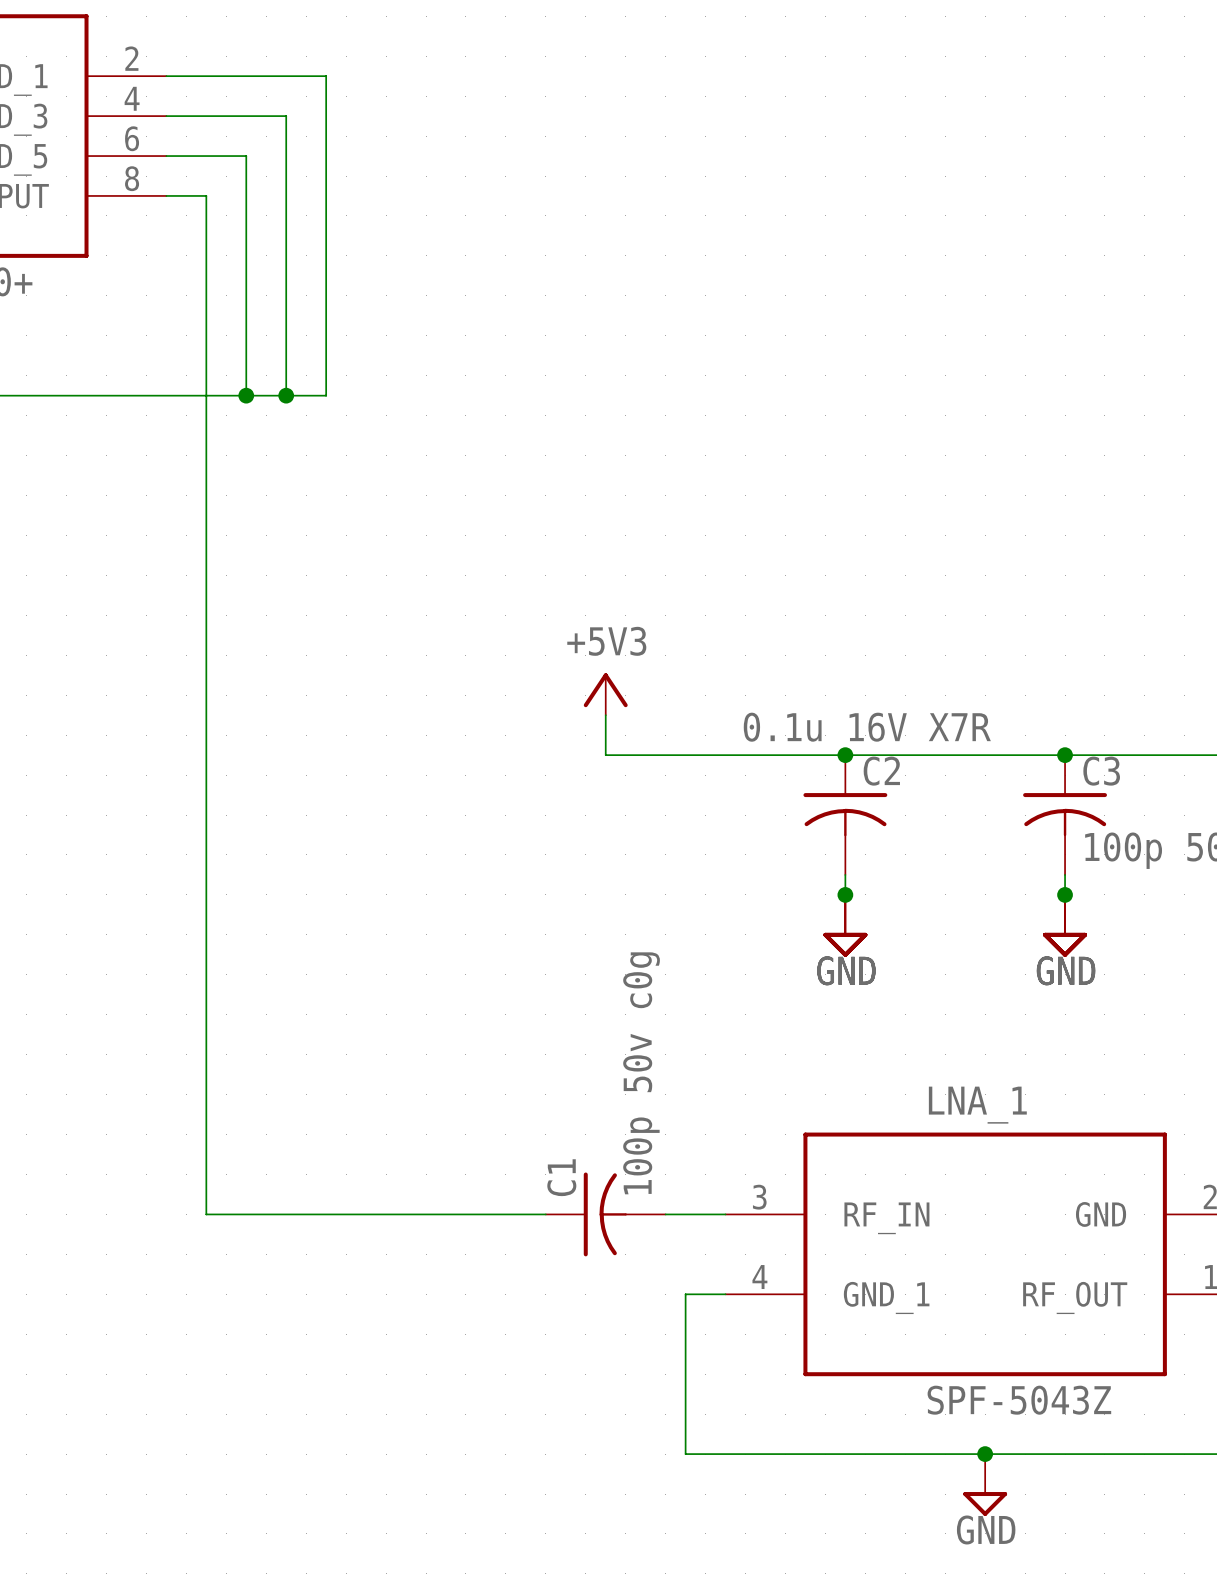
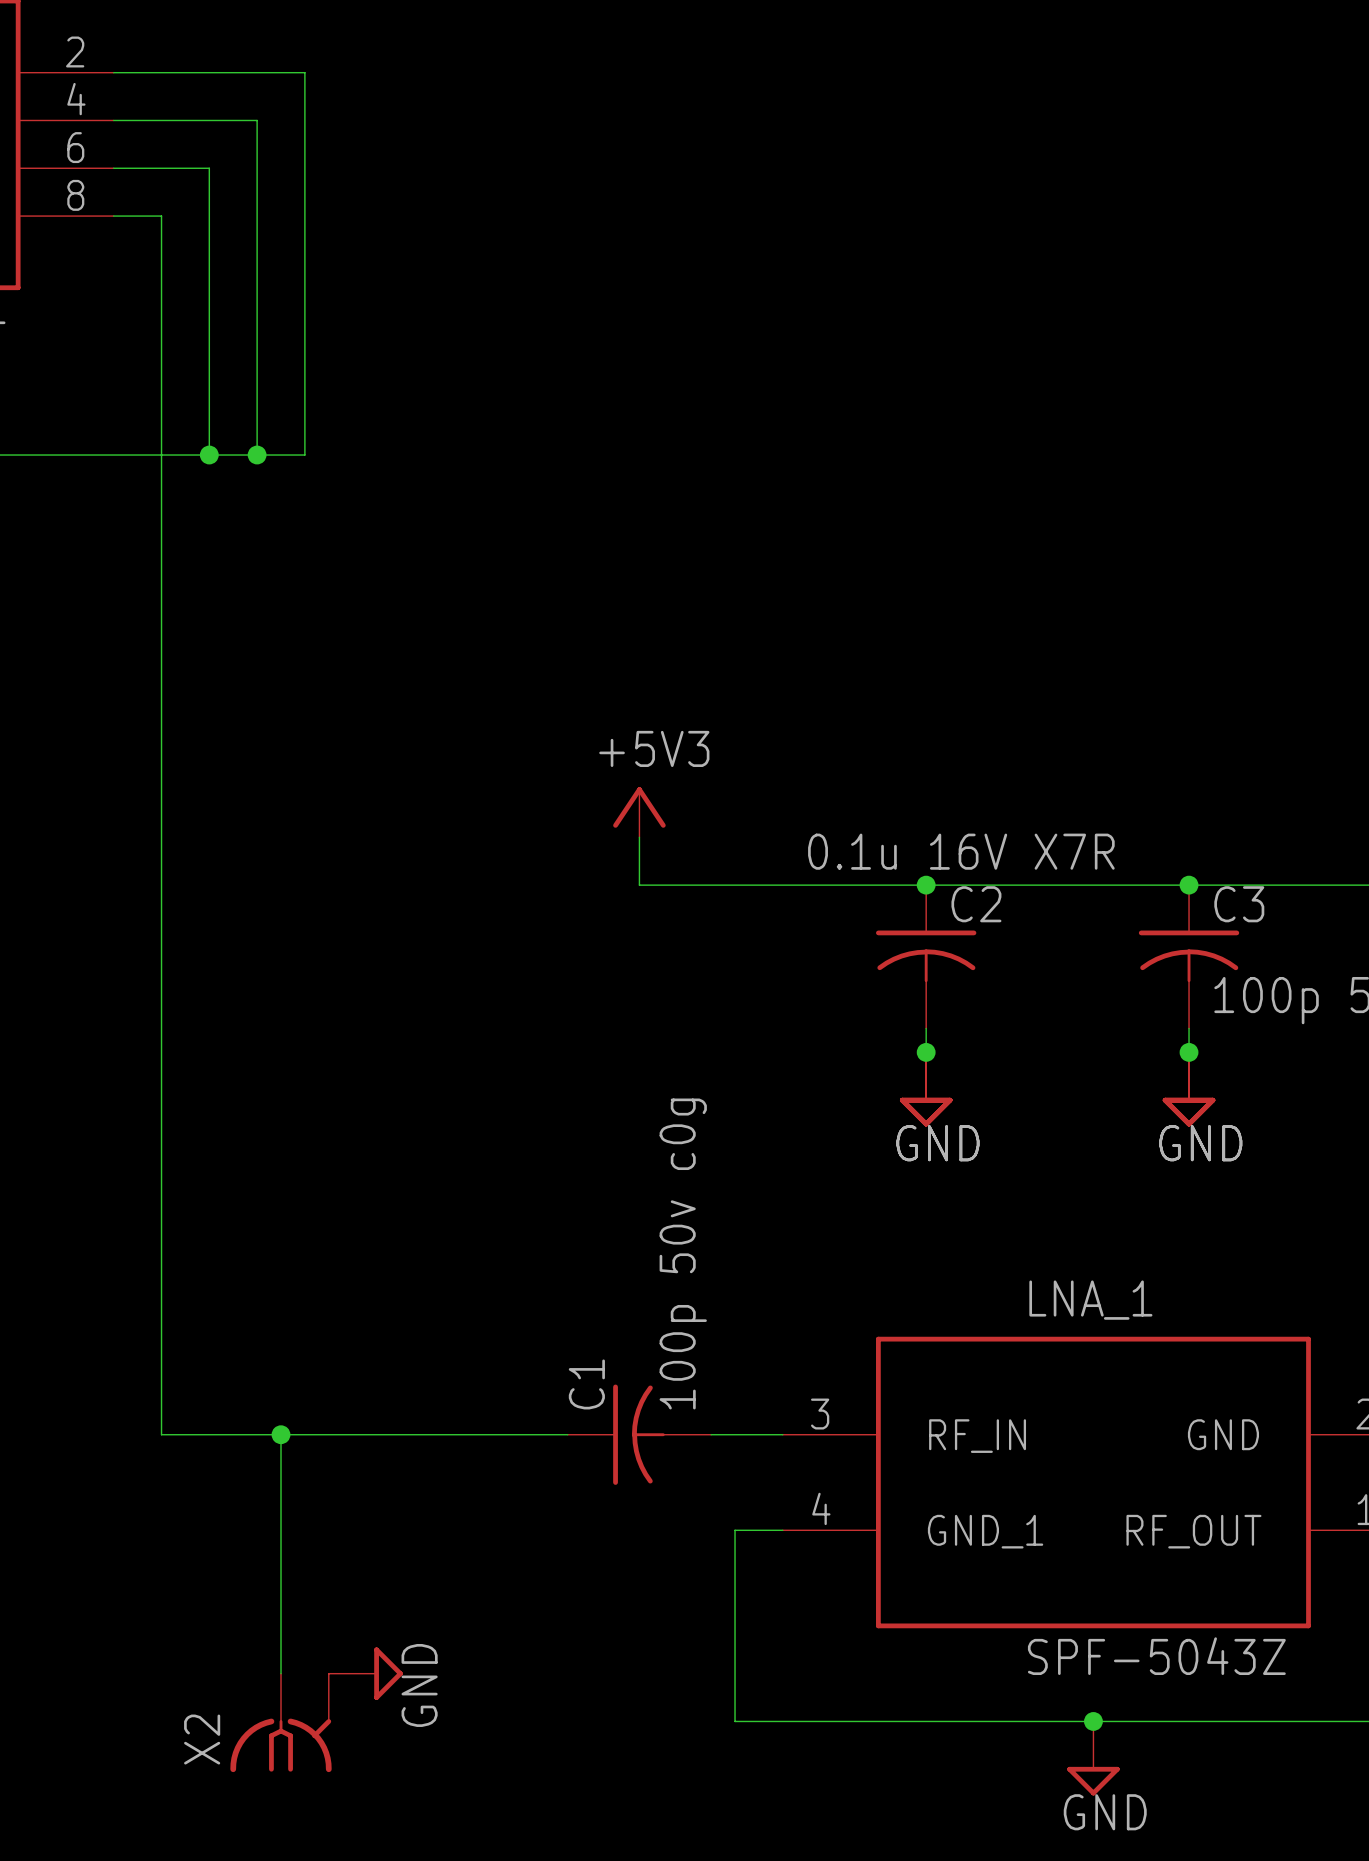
wire: none -> (281, 1434) (281, 1673)
junction: none -> (281, 1434)
power symbol: none -> GND (365, 1673)
X2: none -> (281, 1722)

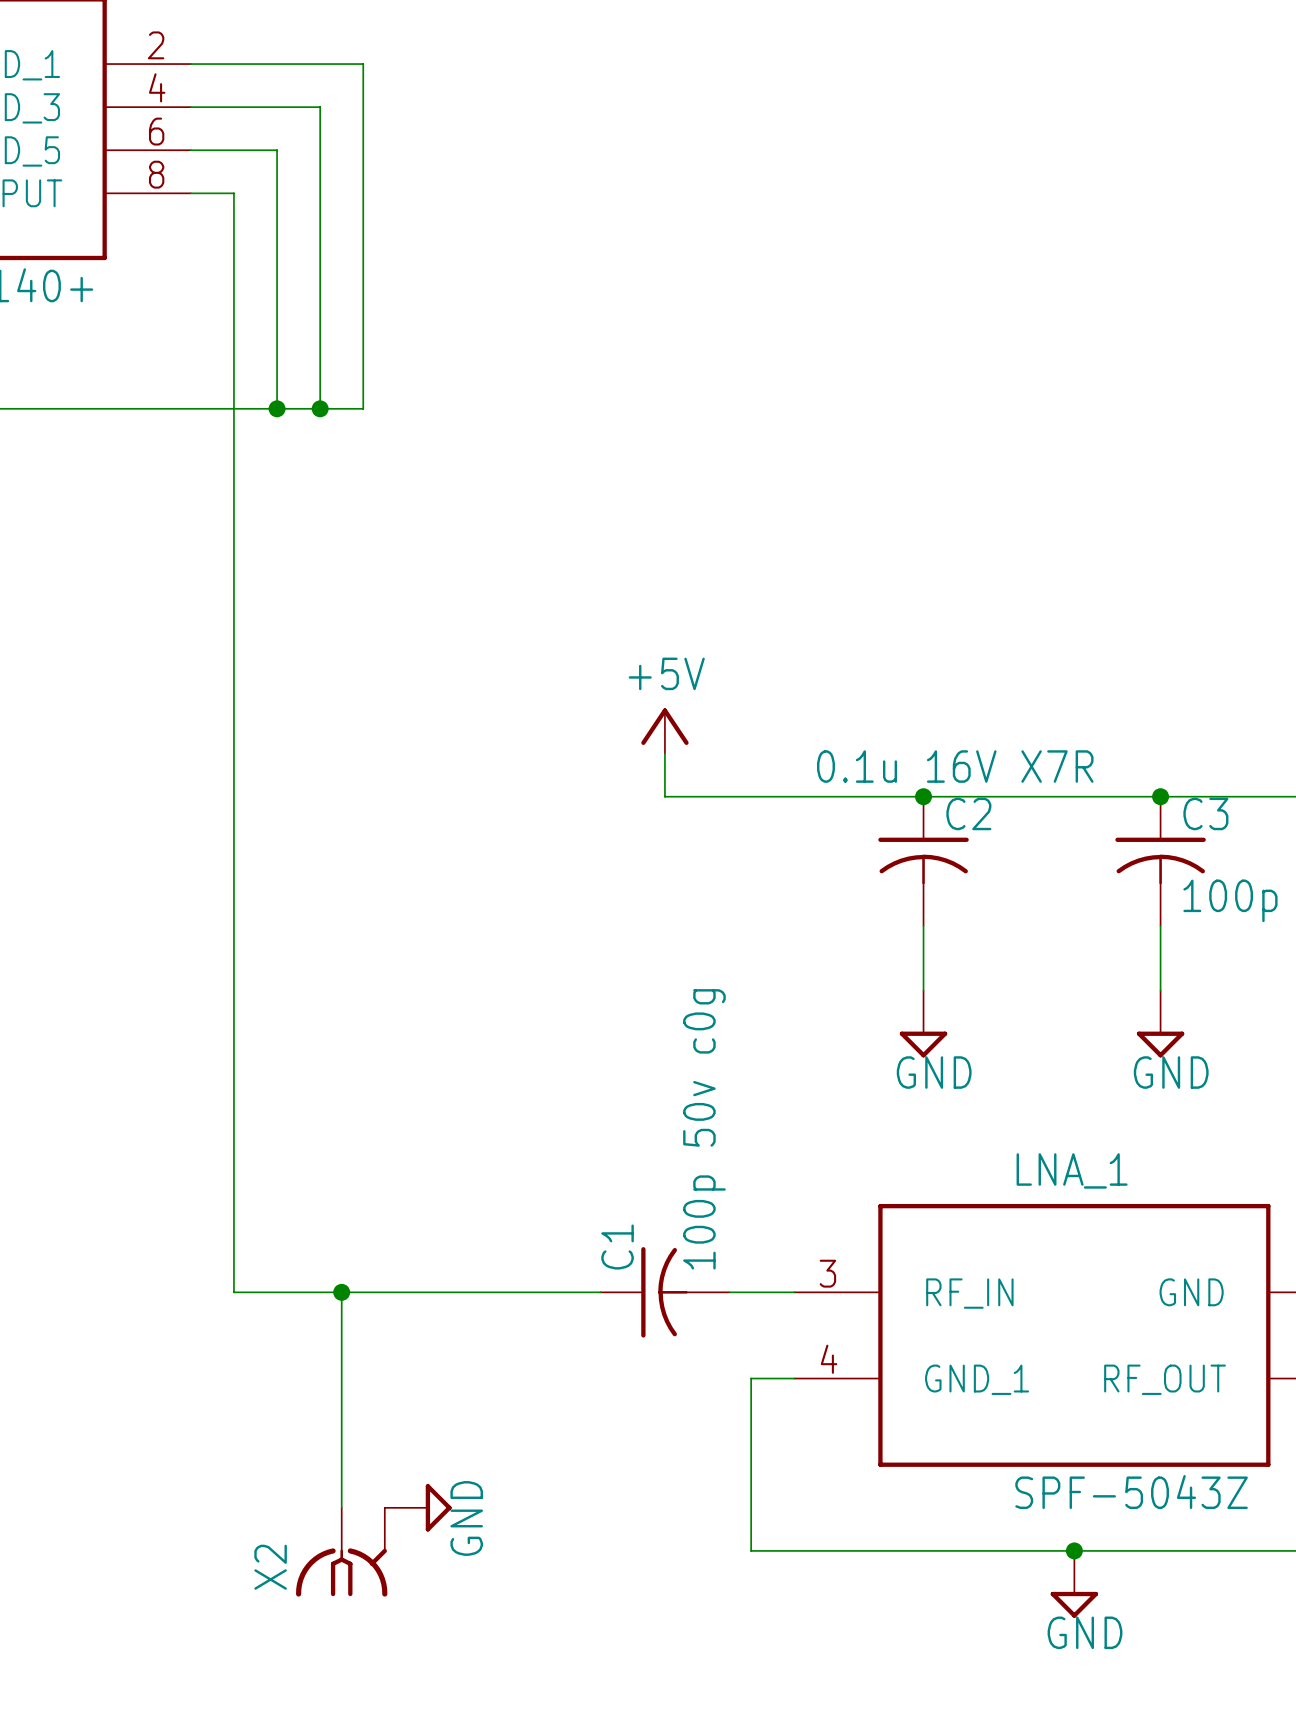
power symbol: +5V3 (639, 812) -> +5V (664, 730)
junction: (926, 1052) -> none
junction: (1189, 1052) -> none
power symbol position: GND (926, 1089) -> GND (923, 1024)
power symbol position: GND (1189, 1089) -> GND (1160, 1024)

